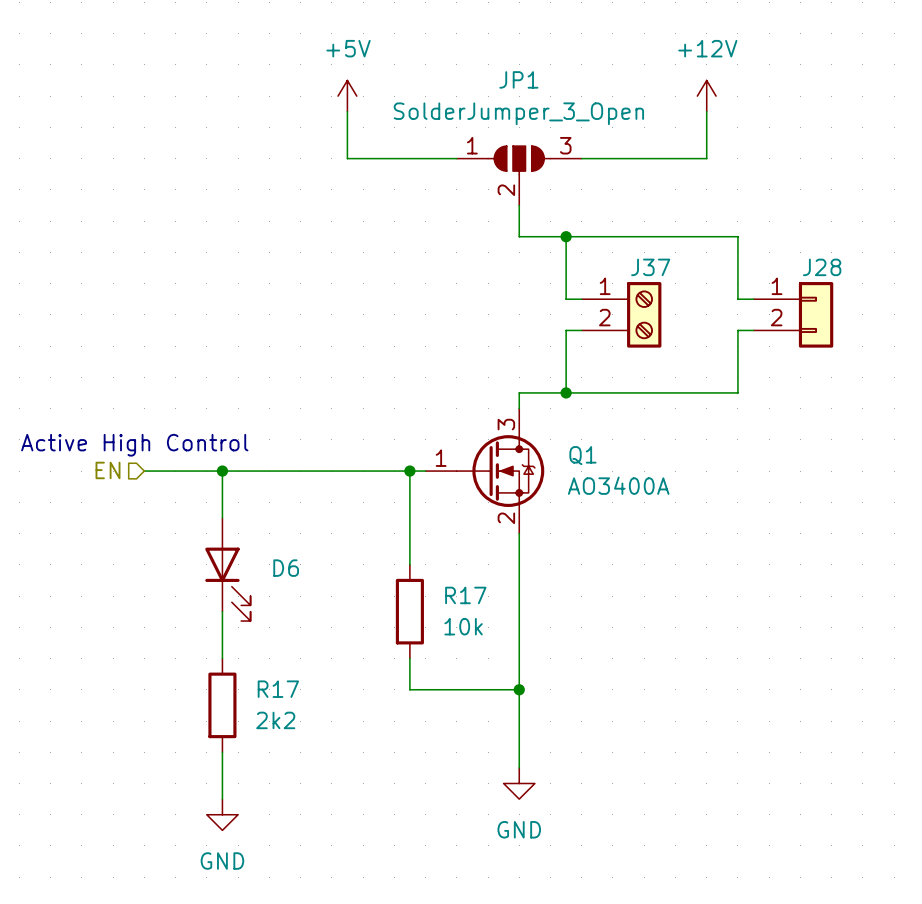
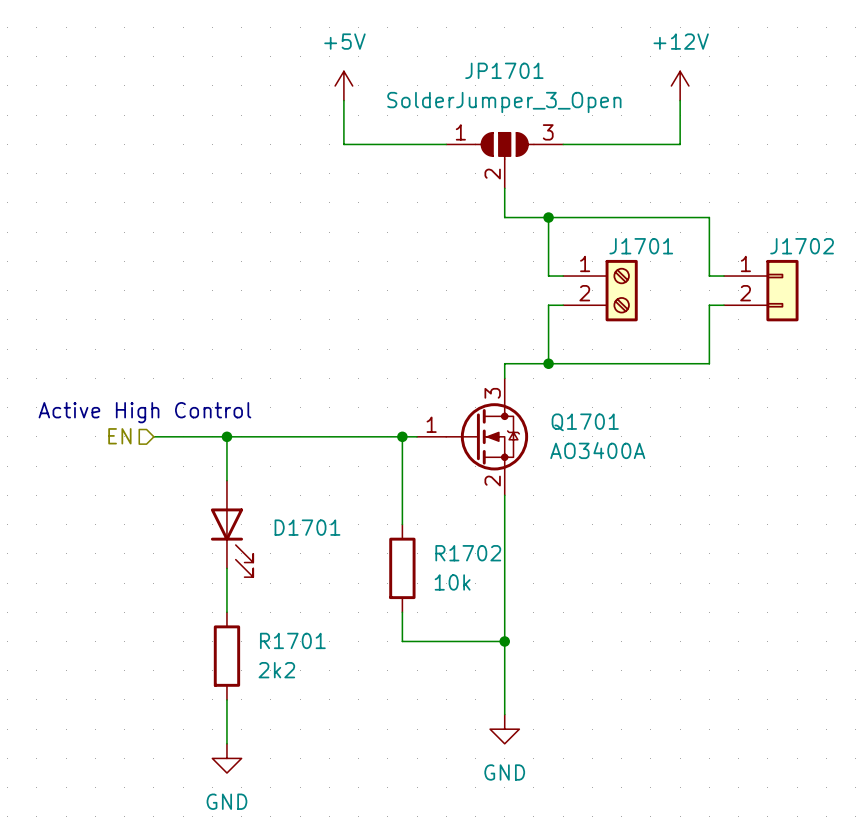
JP1 name: JP1 (518, 79) -> JP1701 (504, 70)
J37 name: J37 (650, 267) -> J1701 (641, 246)
J28 name: J28 (822, 267) -> J1702 (802, 246)
Q1 name: Q1 (582, 455) -> Q1701 (585, 422)
D6 name: D6 (286, 568) -> D1701 (307, 527)
R17 name: R17 (465, 595) -> R1702 (468, 553)
R17 name: R17 (278, 689) -> R1701 (292, 640)

